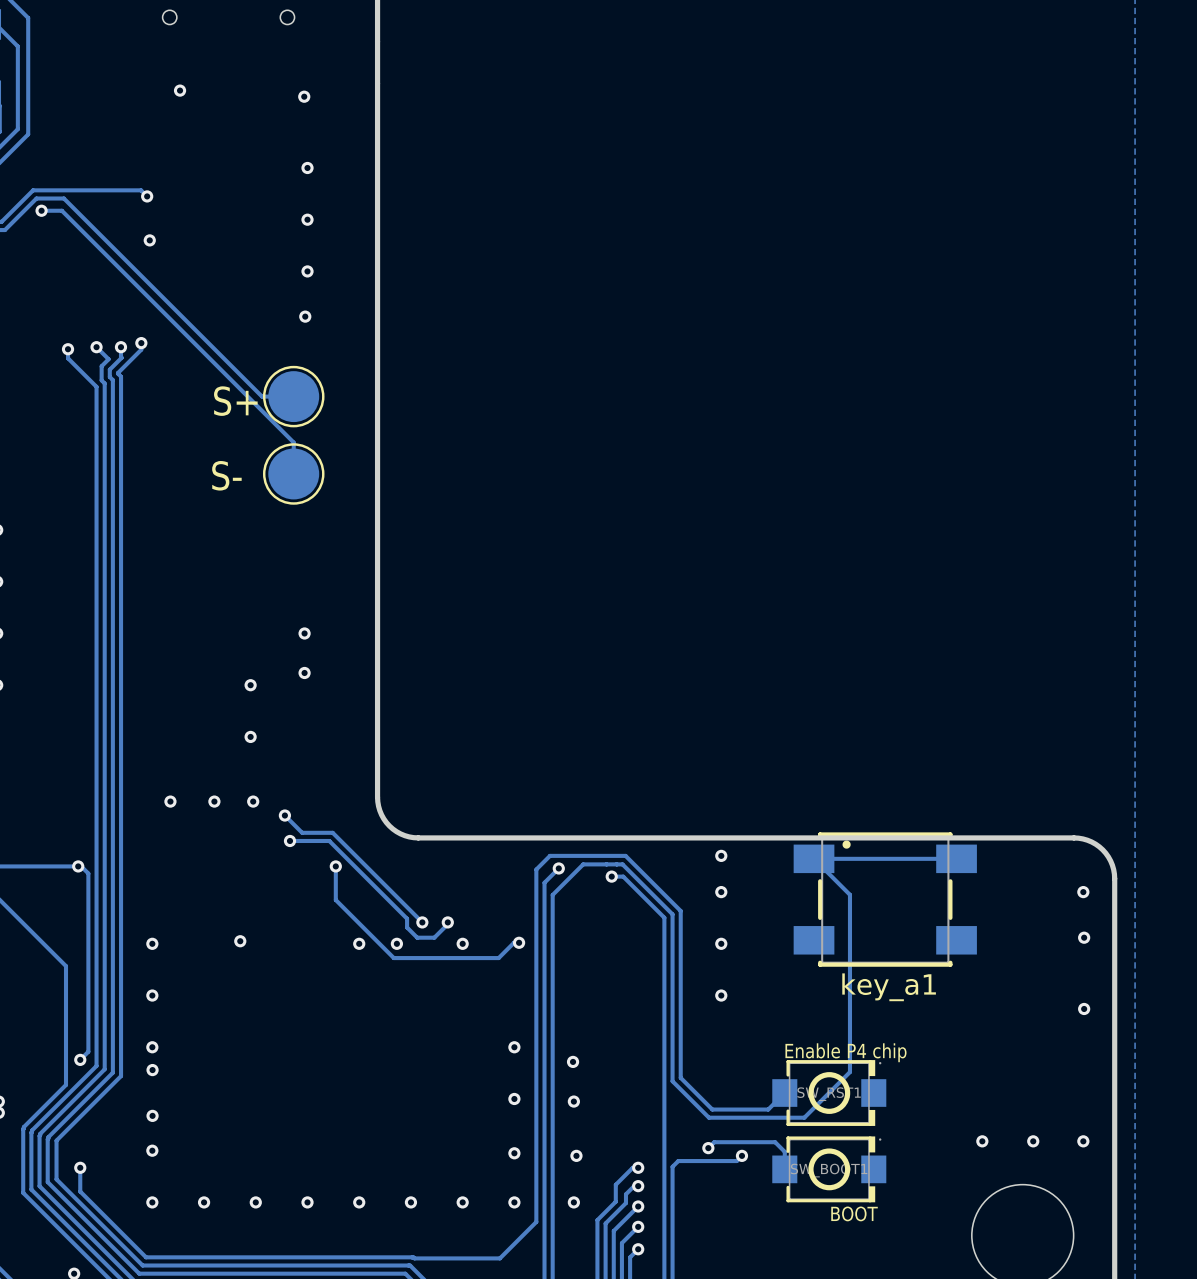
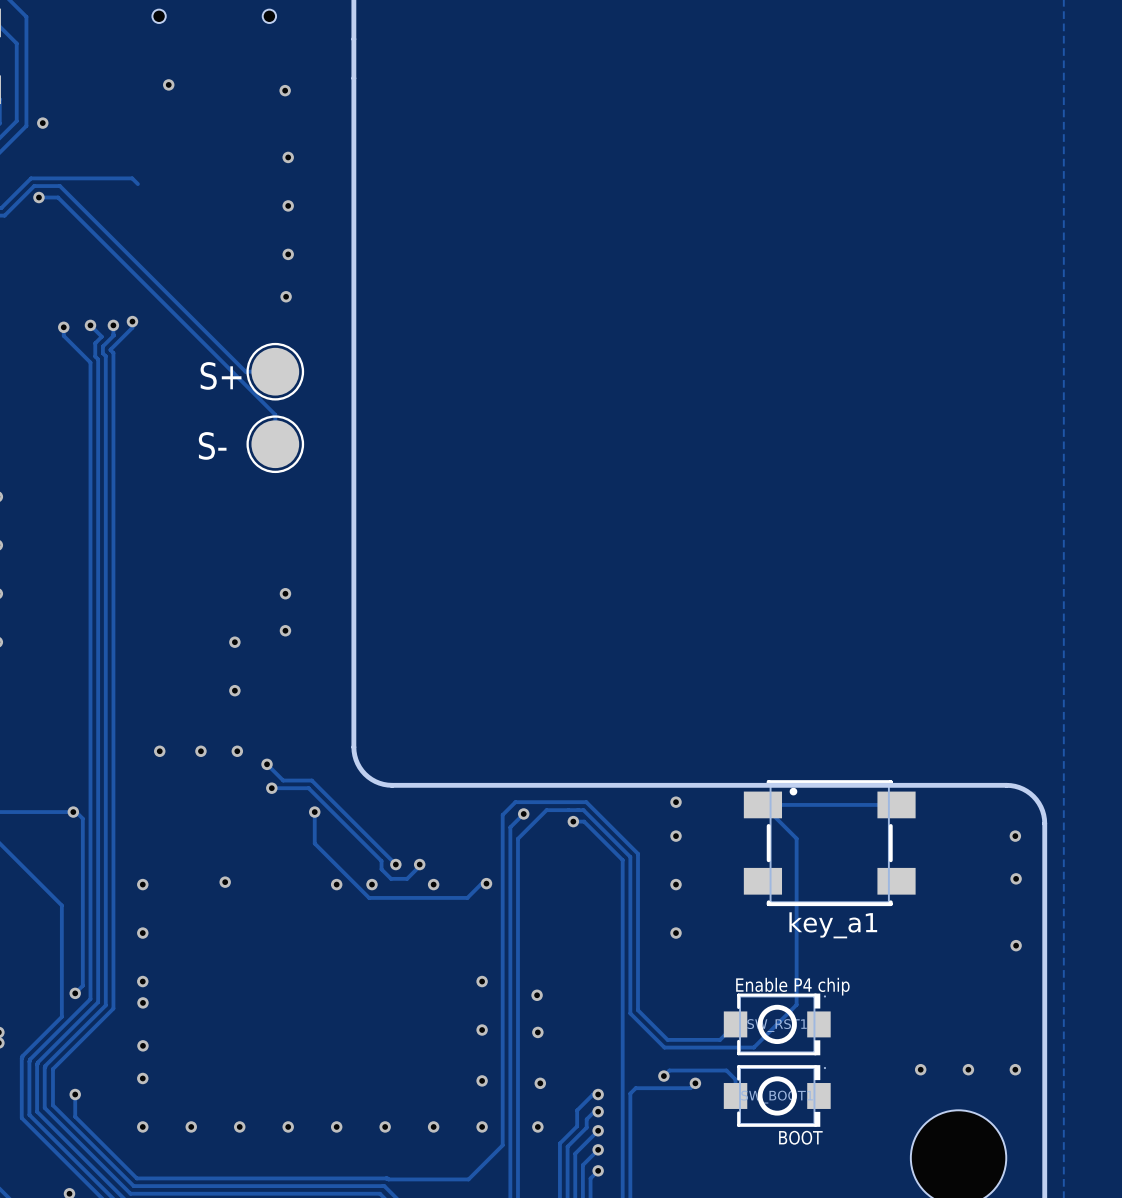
via: none -> (42, 123)
via: (147, 196) -> none
via: (149, 240) -> none

